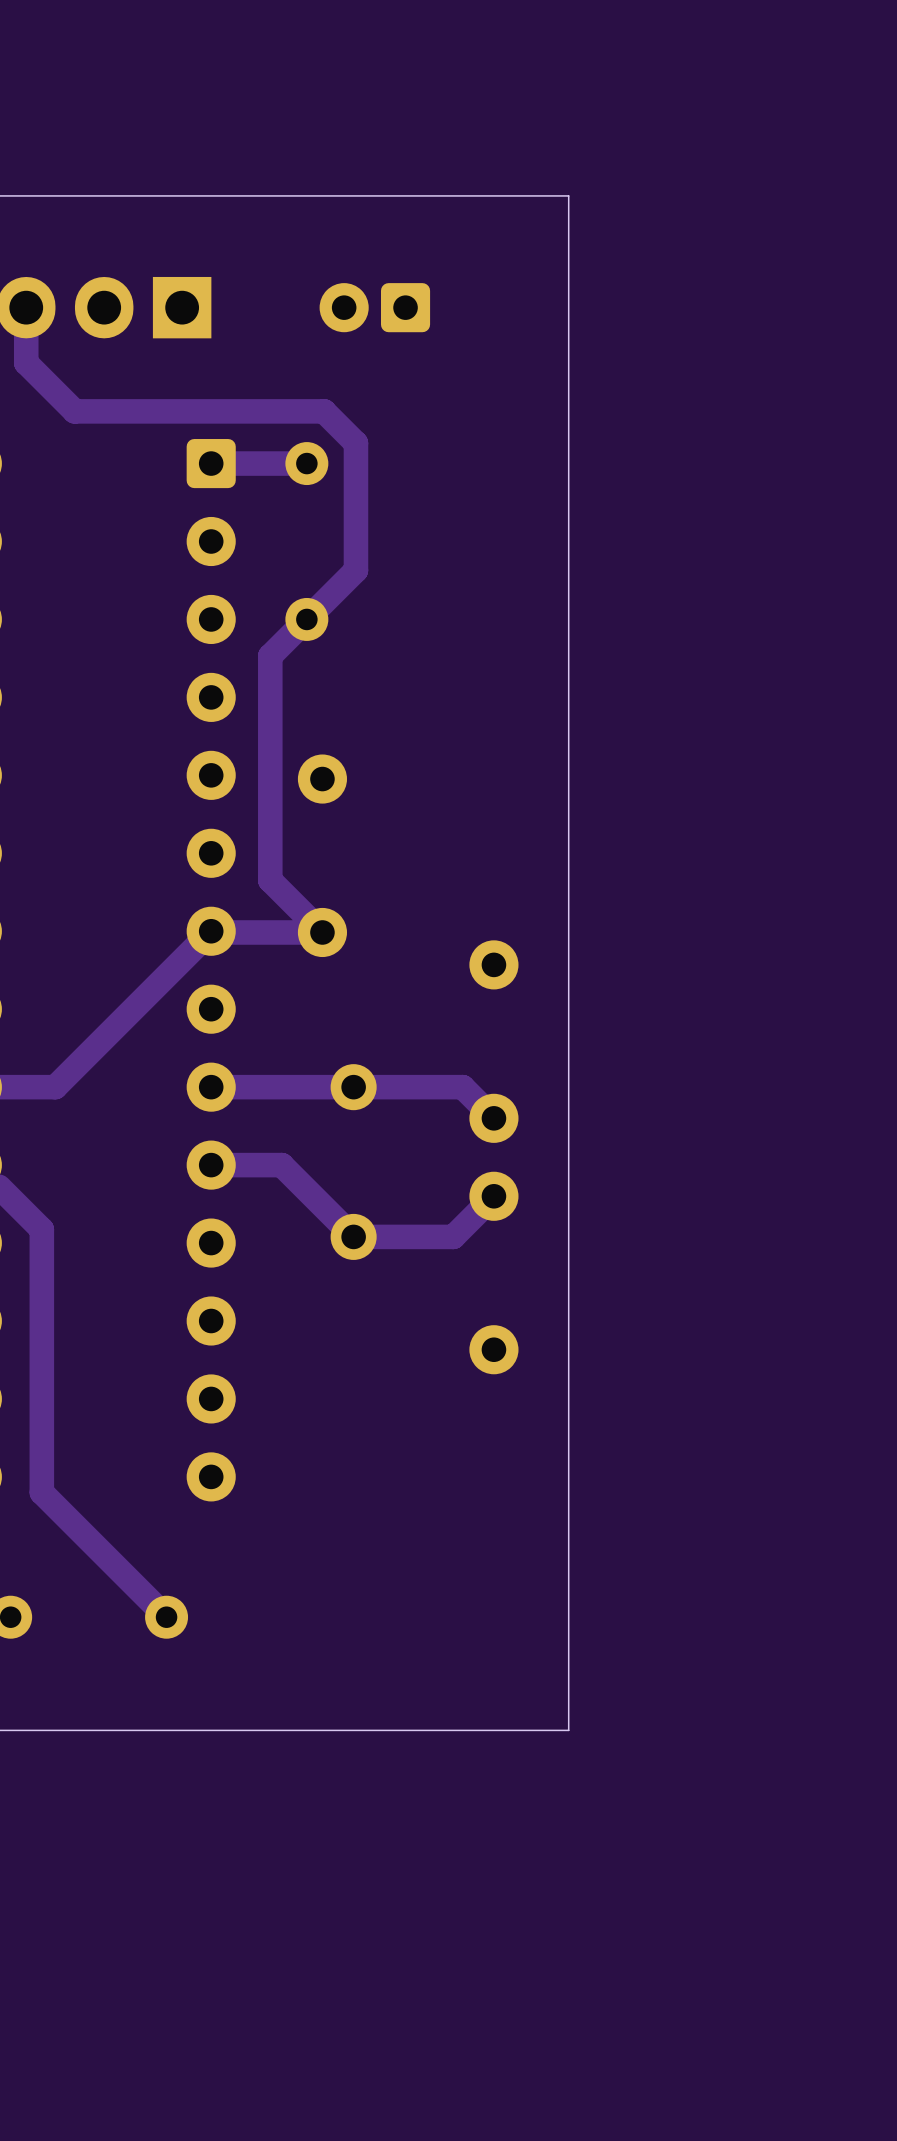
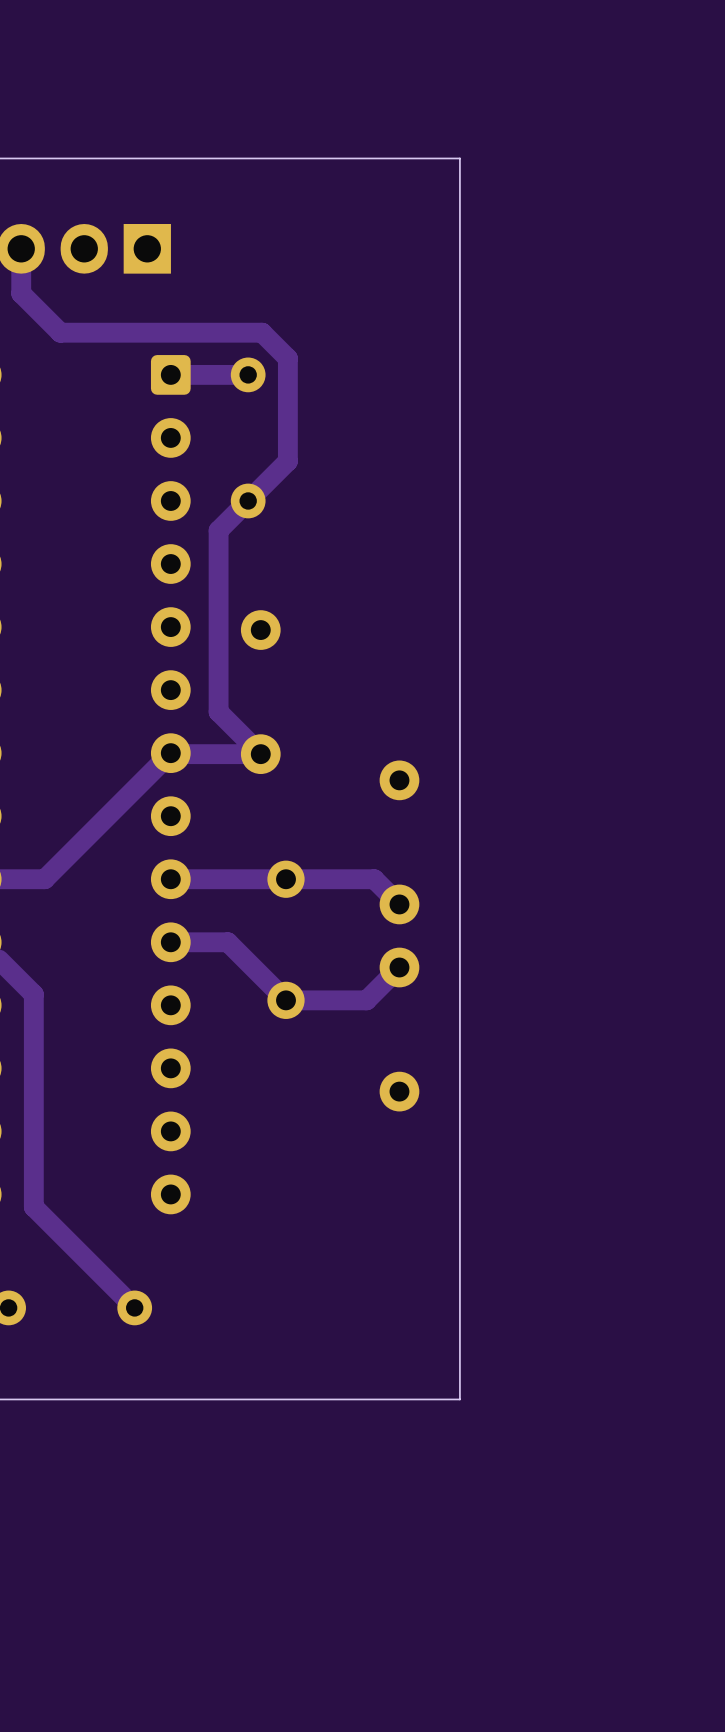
part: (374, 307) -> none

